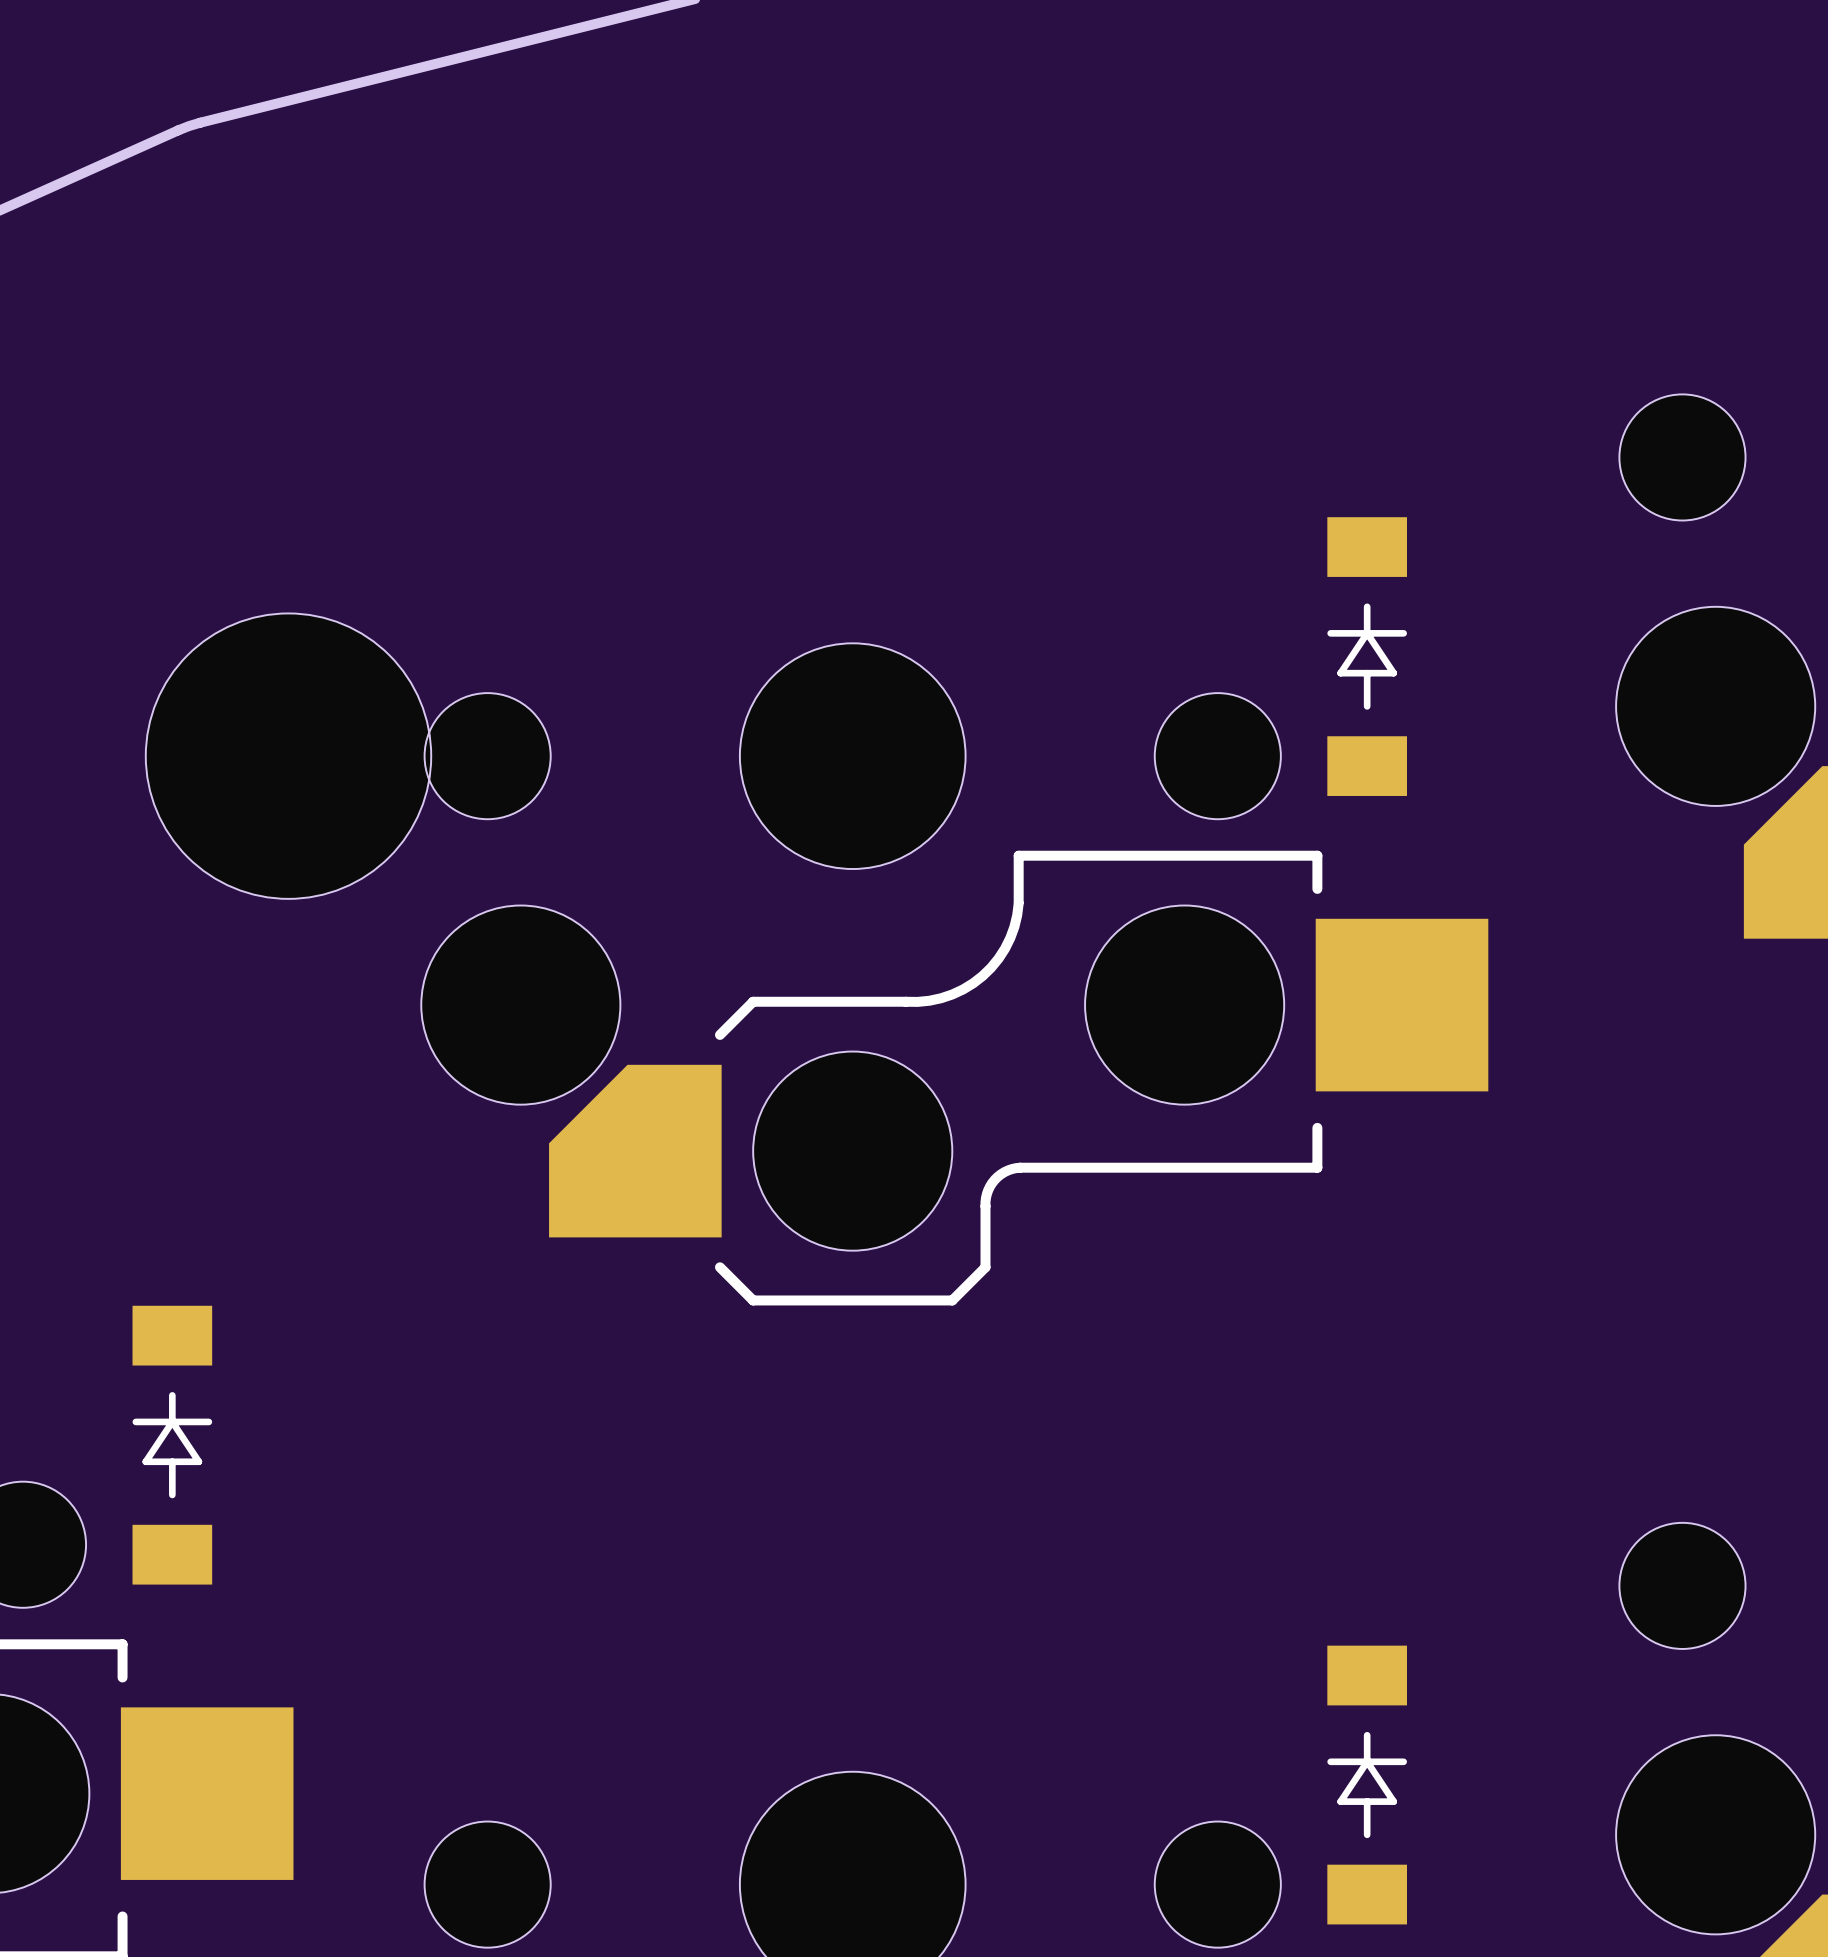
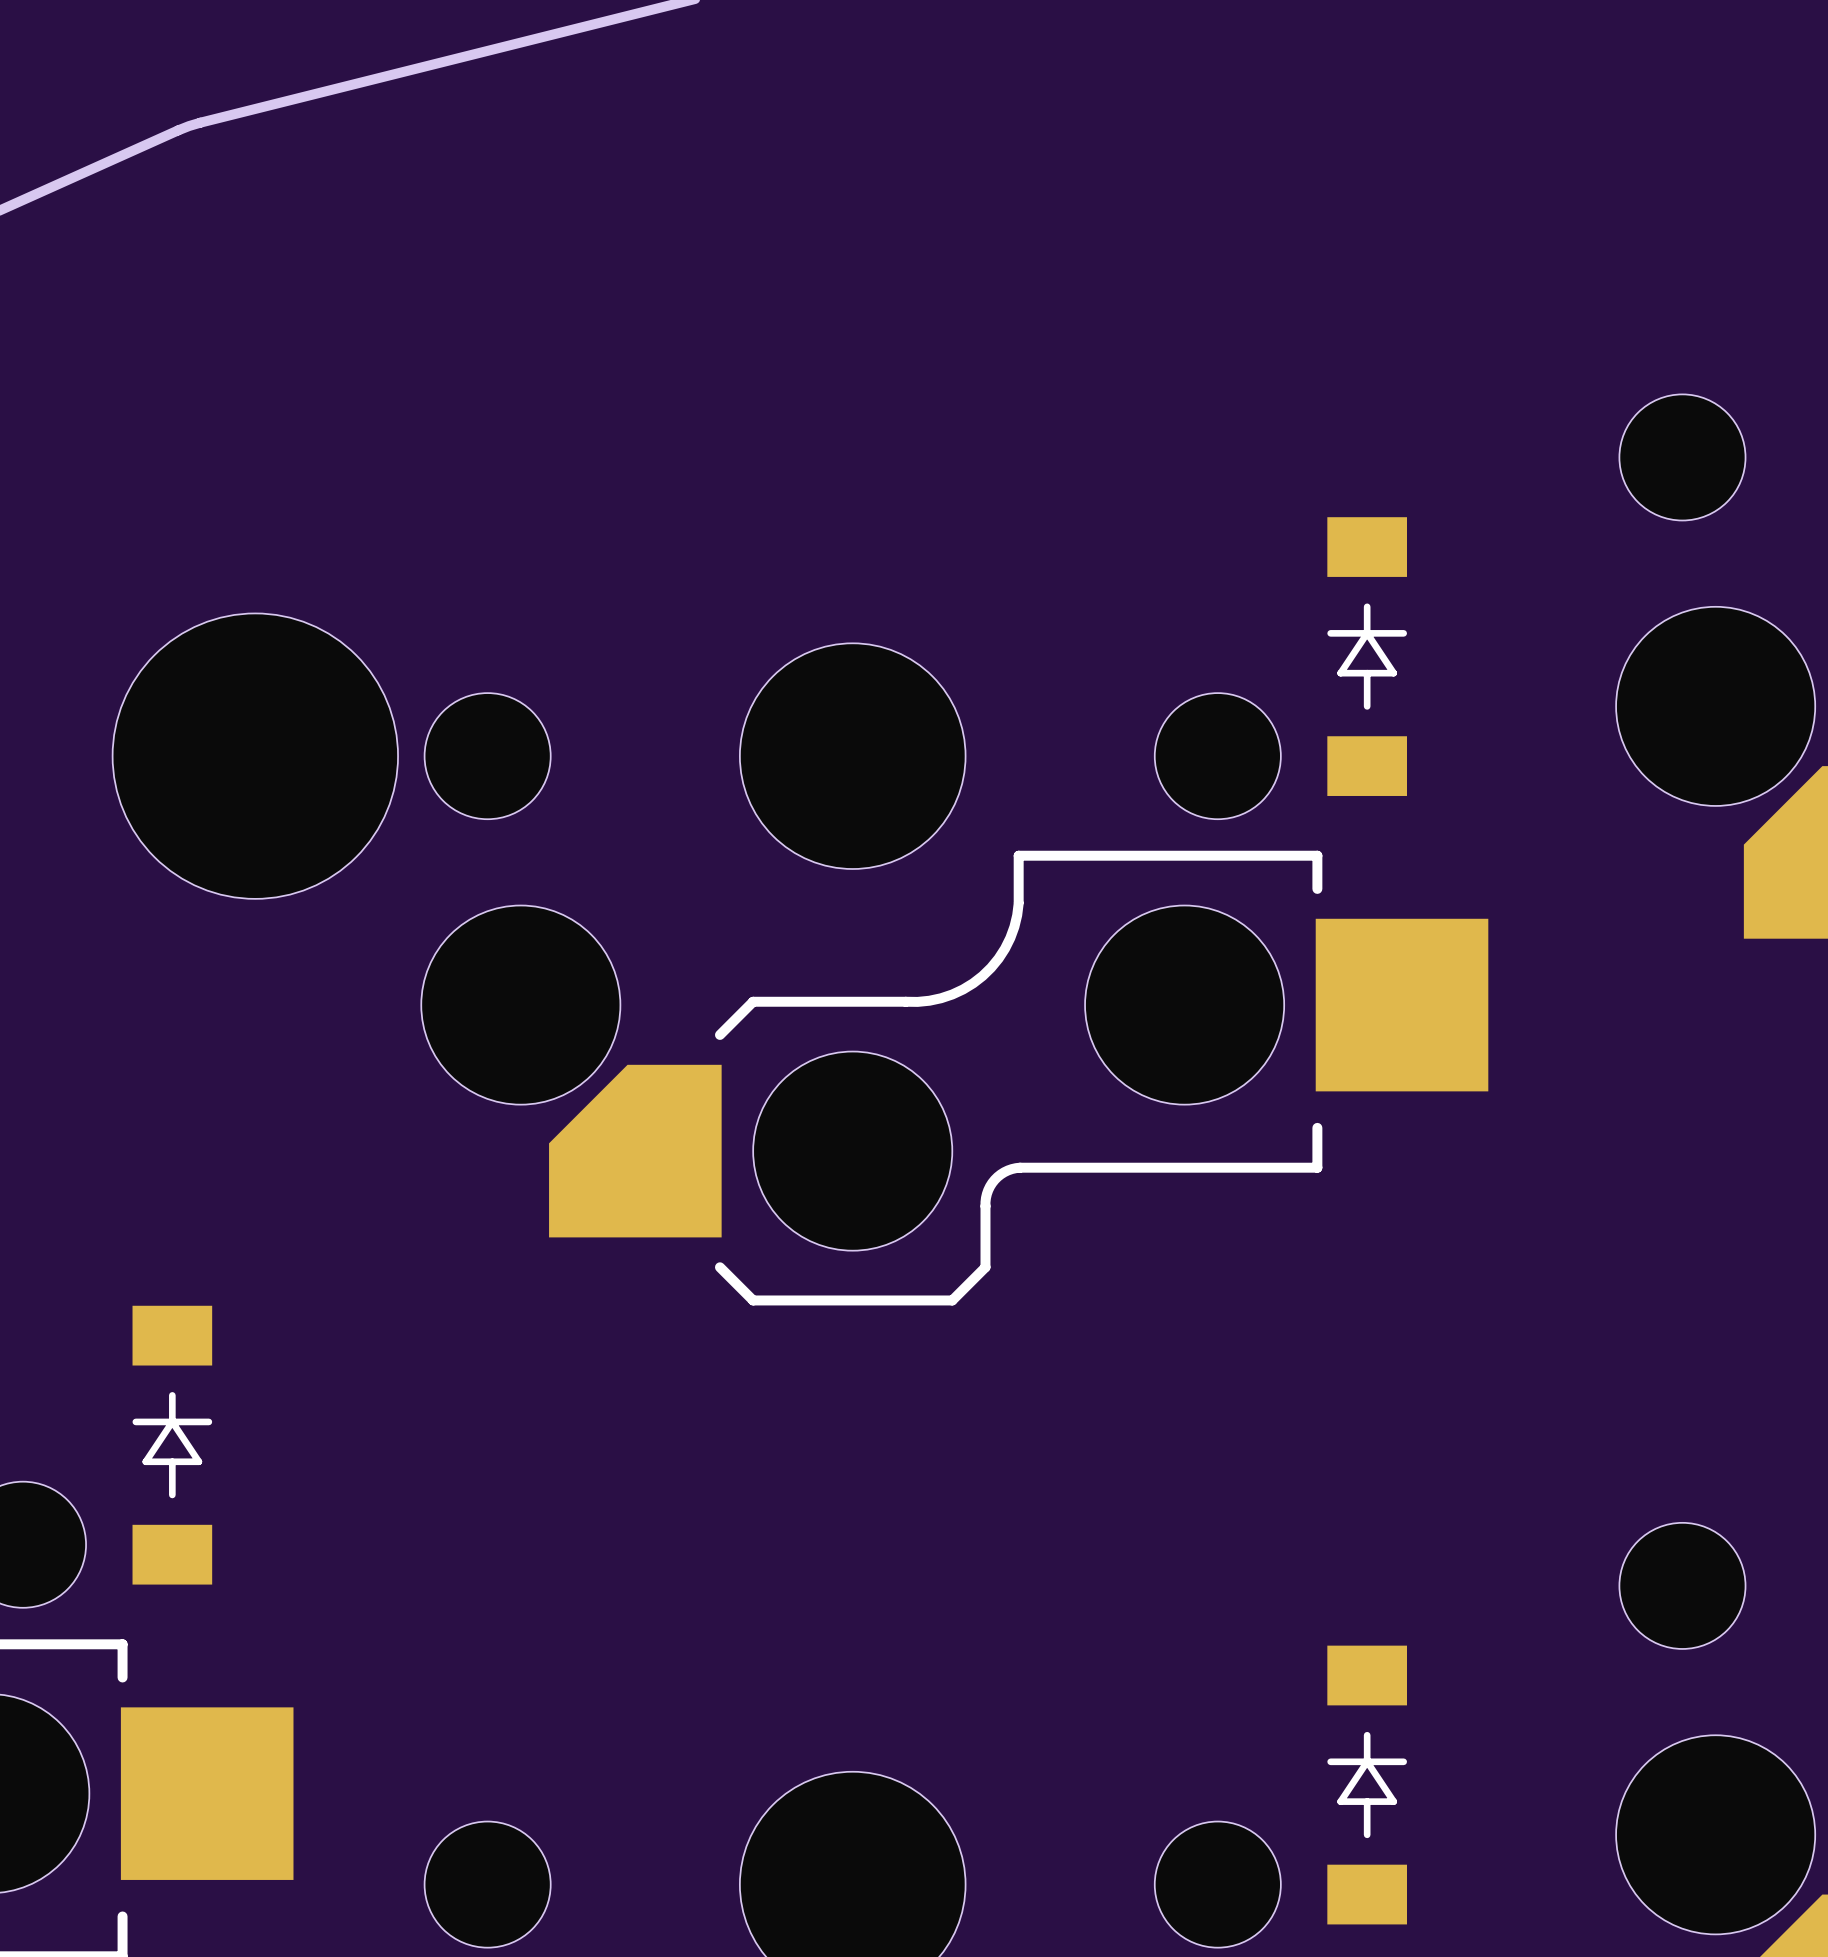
part position: (288, 756) -> (255, 756)

